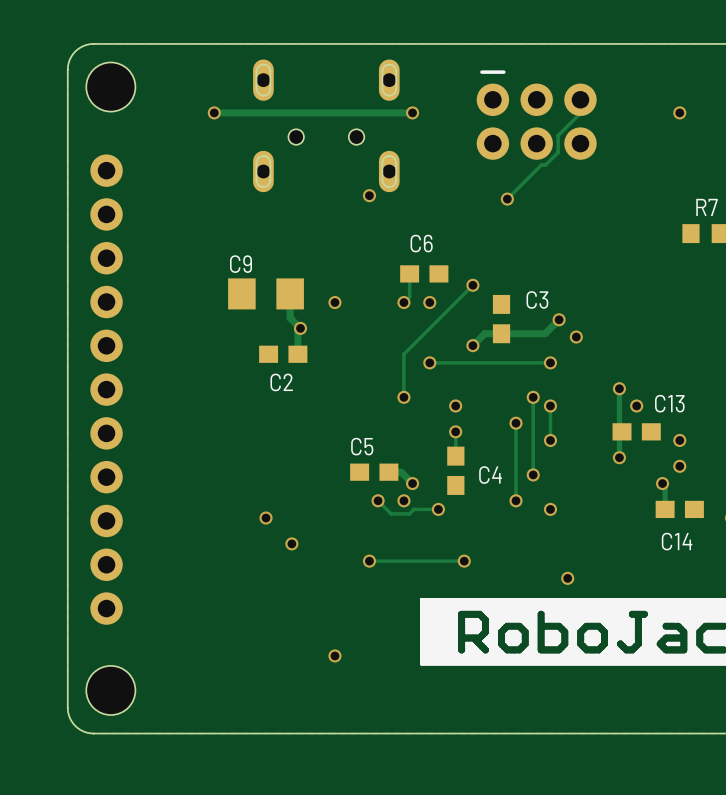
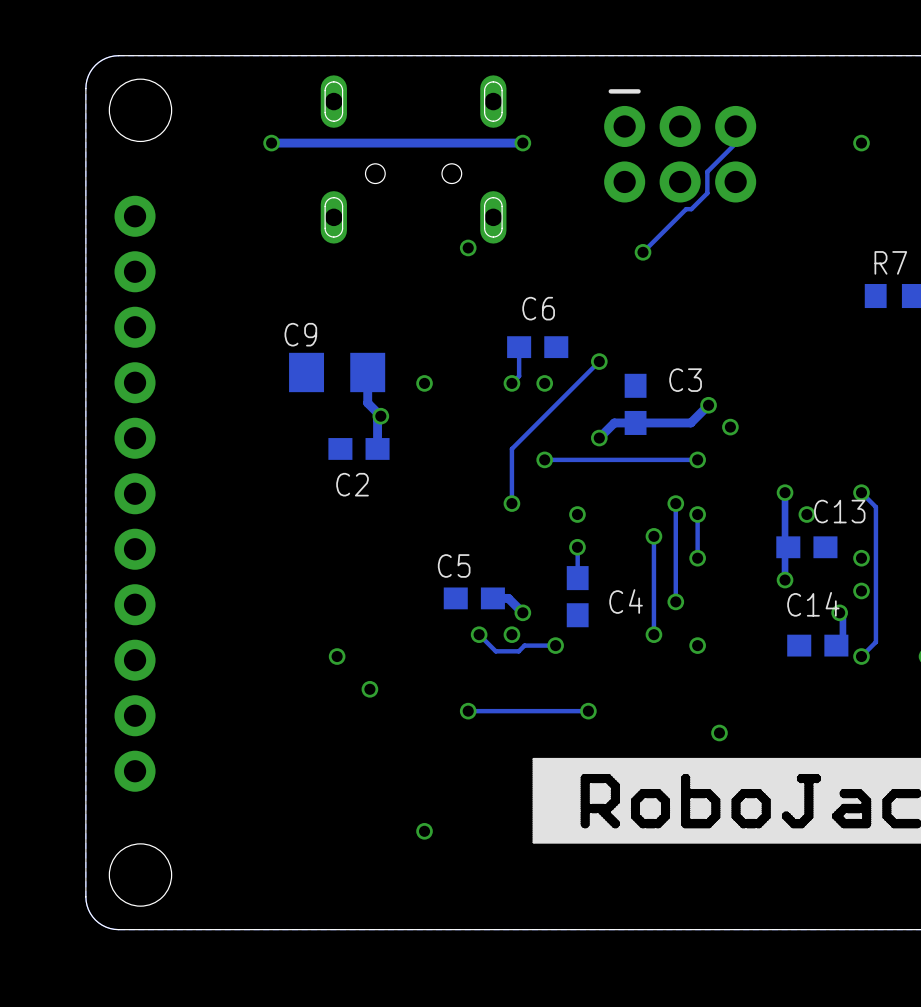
track: none -> (861, 492) (875, 507) (875, 642) (861, 656)
via: none -> (861, 492)
C14 position: (679, 509) -> (817, 645)
via: none -> (861, 656)
C14 name position: C14 (677, 541) -> C14 (813, 604)

